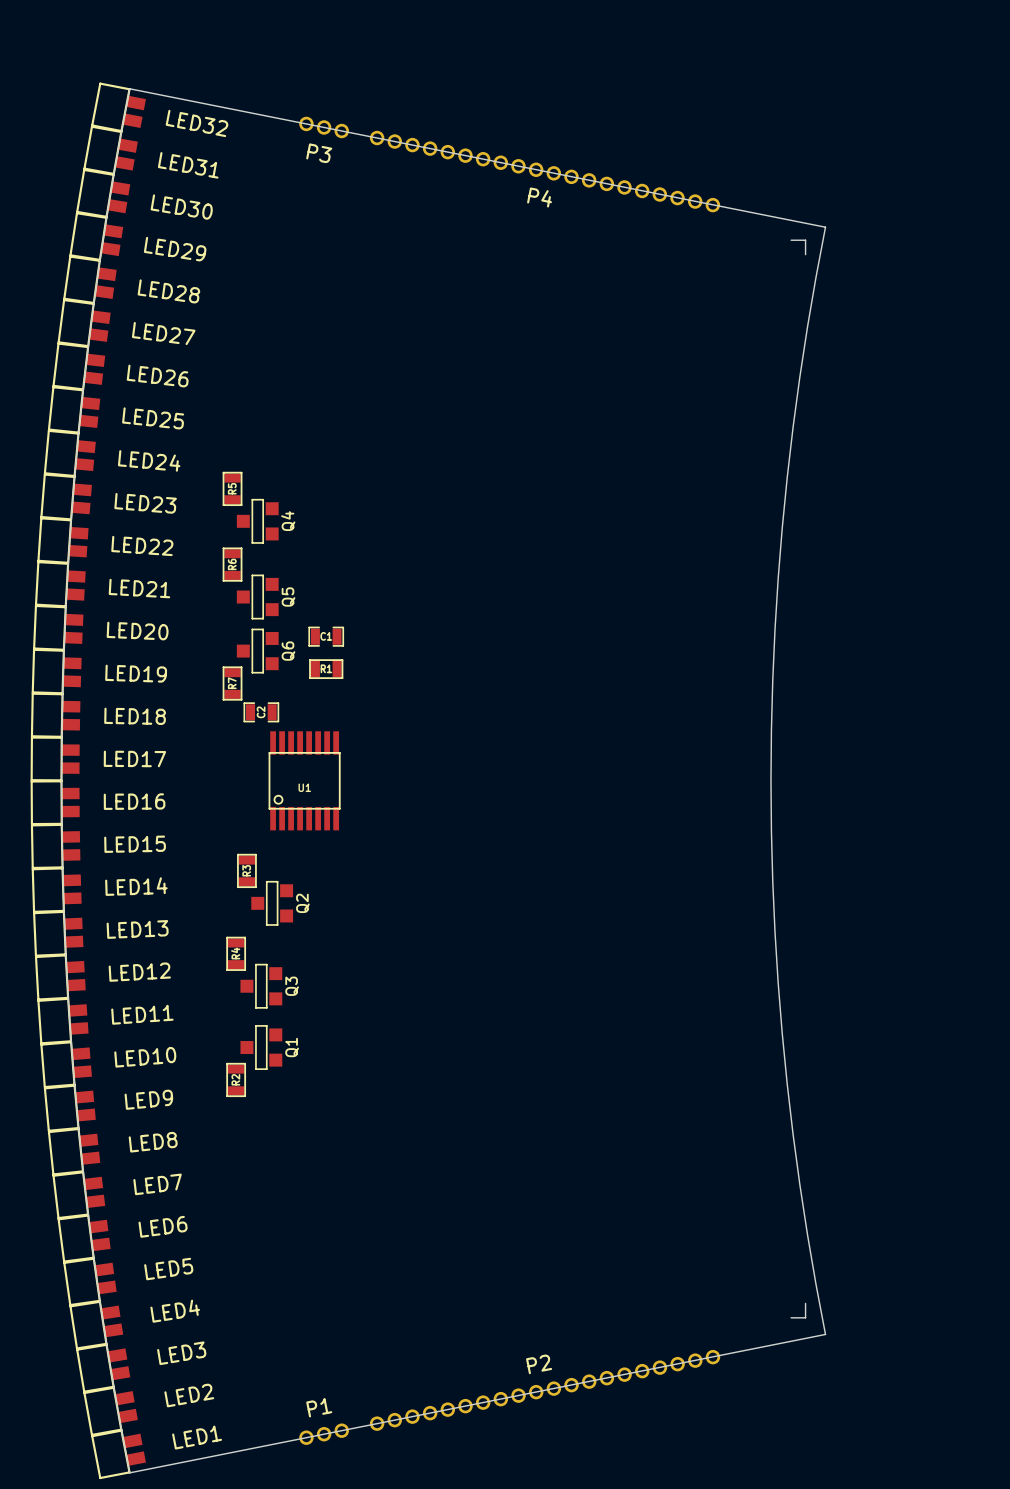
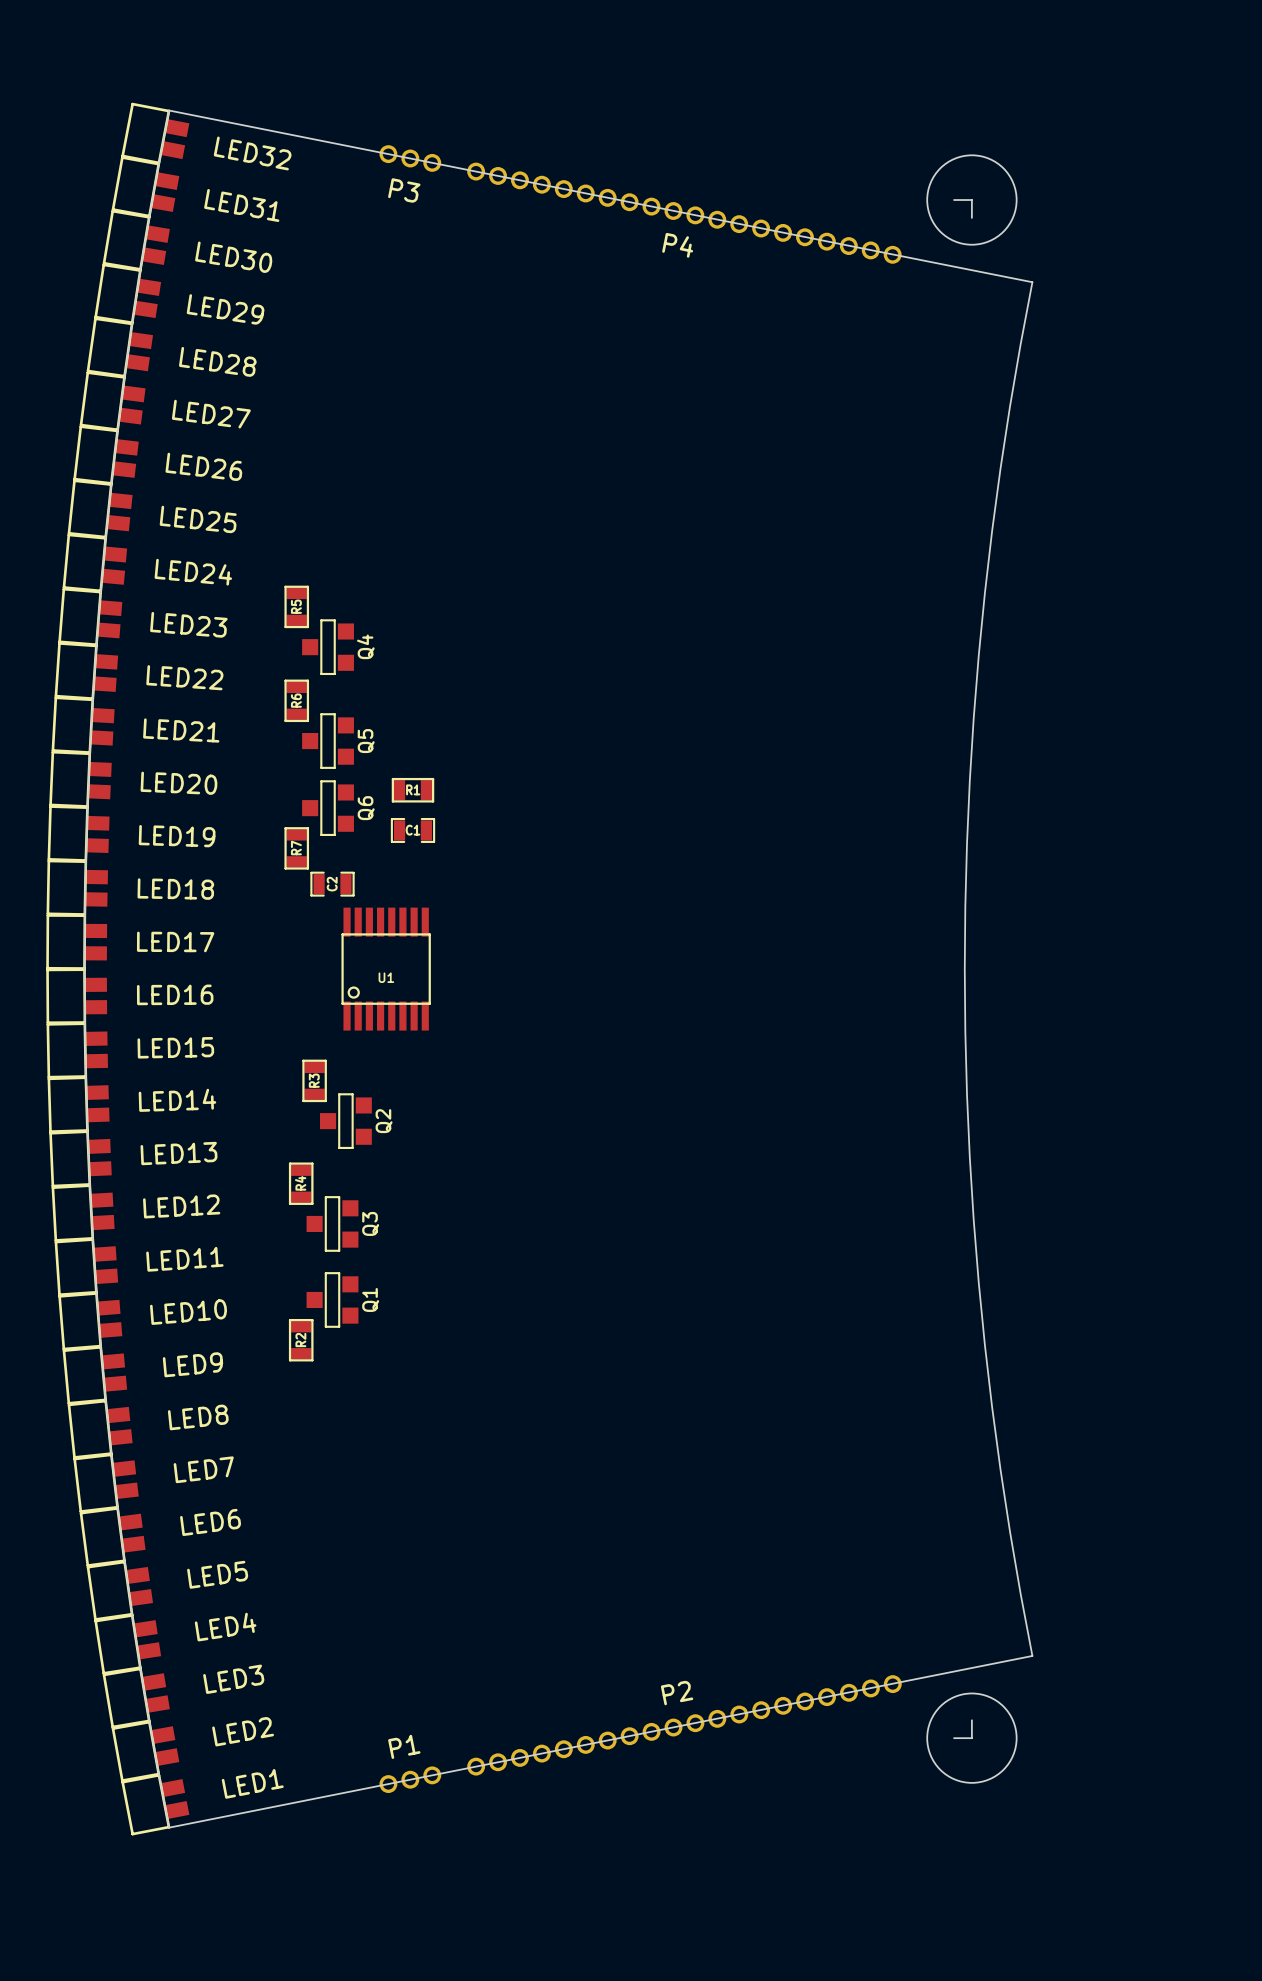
round board edge: none -> [926, 154, 1018, 246]
board edge: (791, 240) (805, 240) (805, 254) -> (954, 200) (971, 200) (971, 217)
C1 position: (326, 636) -> (412, 830)
R1 position: (326, 669) -> (412, 790)
board edge: (805, 1303) (805, 1317) (791, 1317) -> (971, 1720) (971, 1738) (954, 1738)
round board edge: none -> [926, 1692, 1018, 1784]

